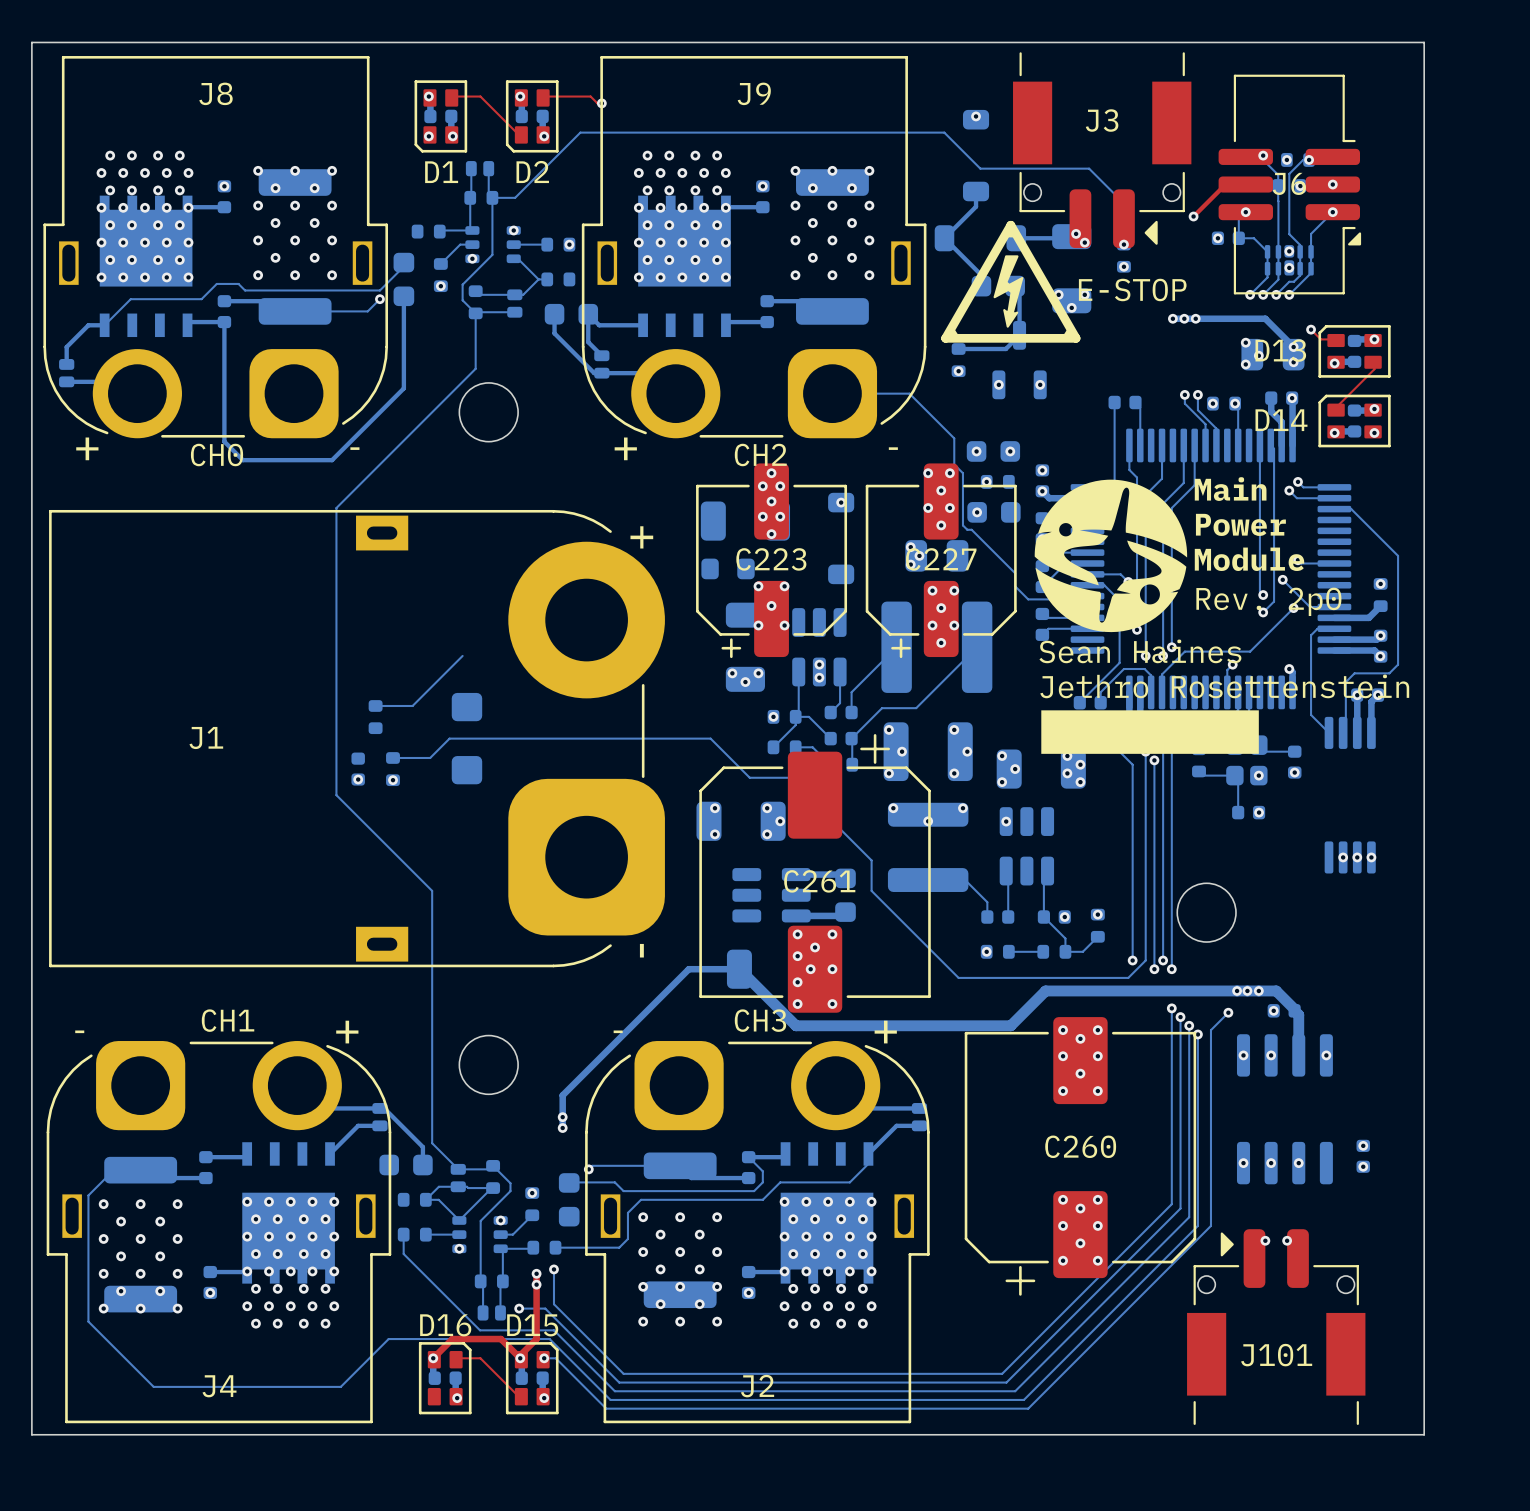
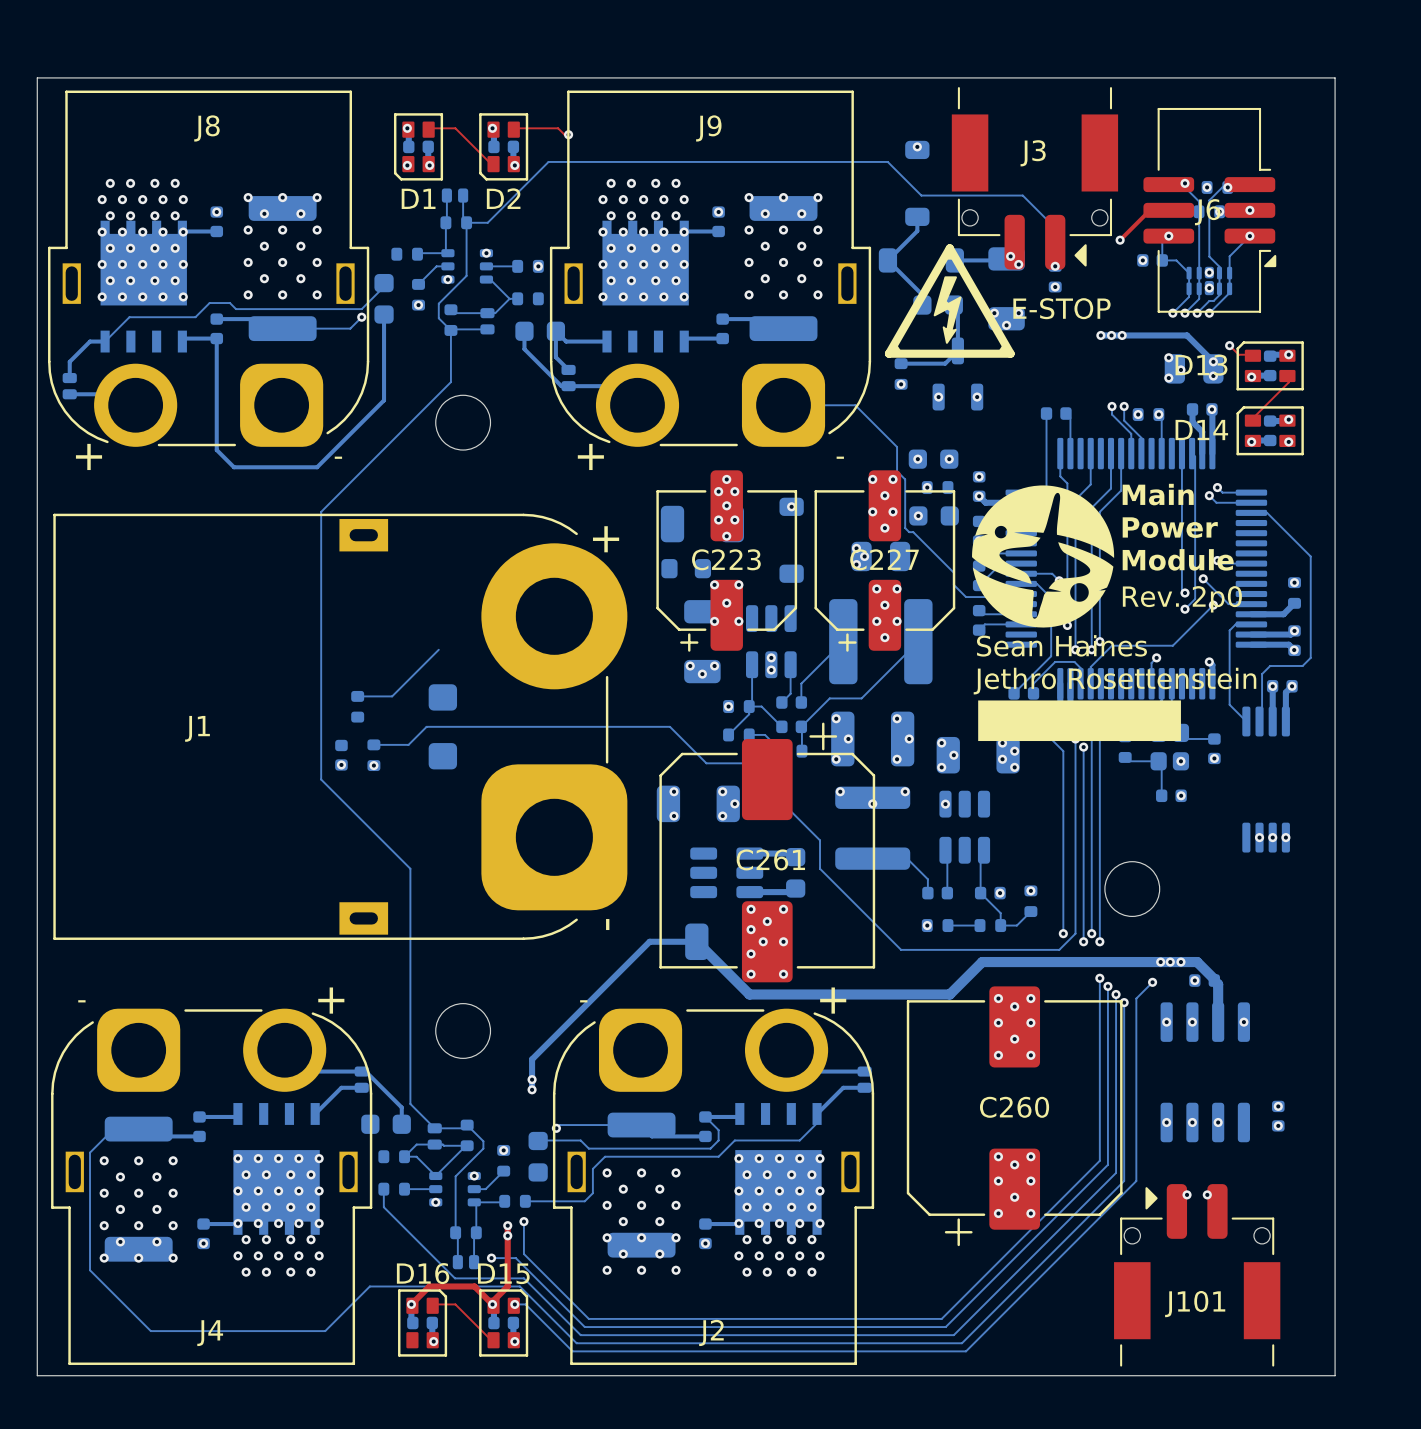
text: CH0 (217, 455) -> none
text: CH2 (760, 455) -> none
text: CH1 (228, 1020) -> none
text: CH3 (760, 1020) -> none

